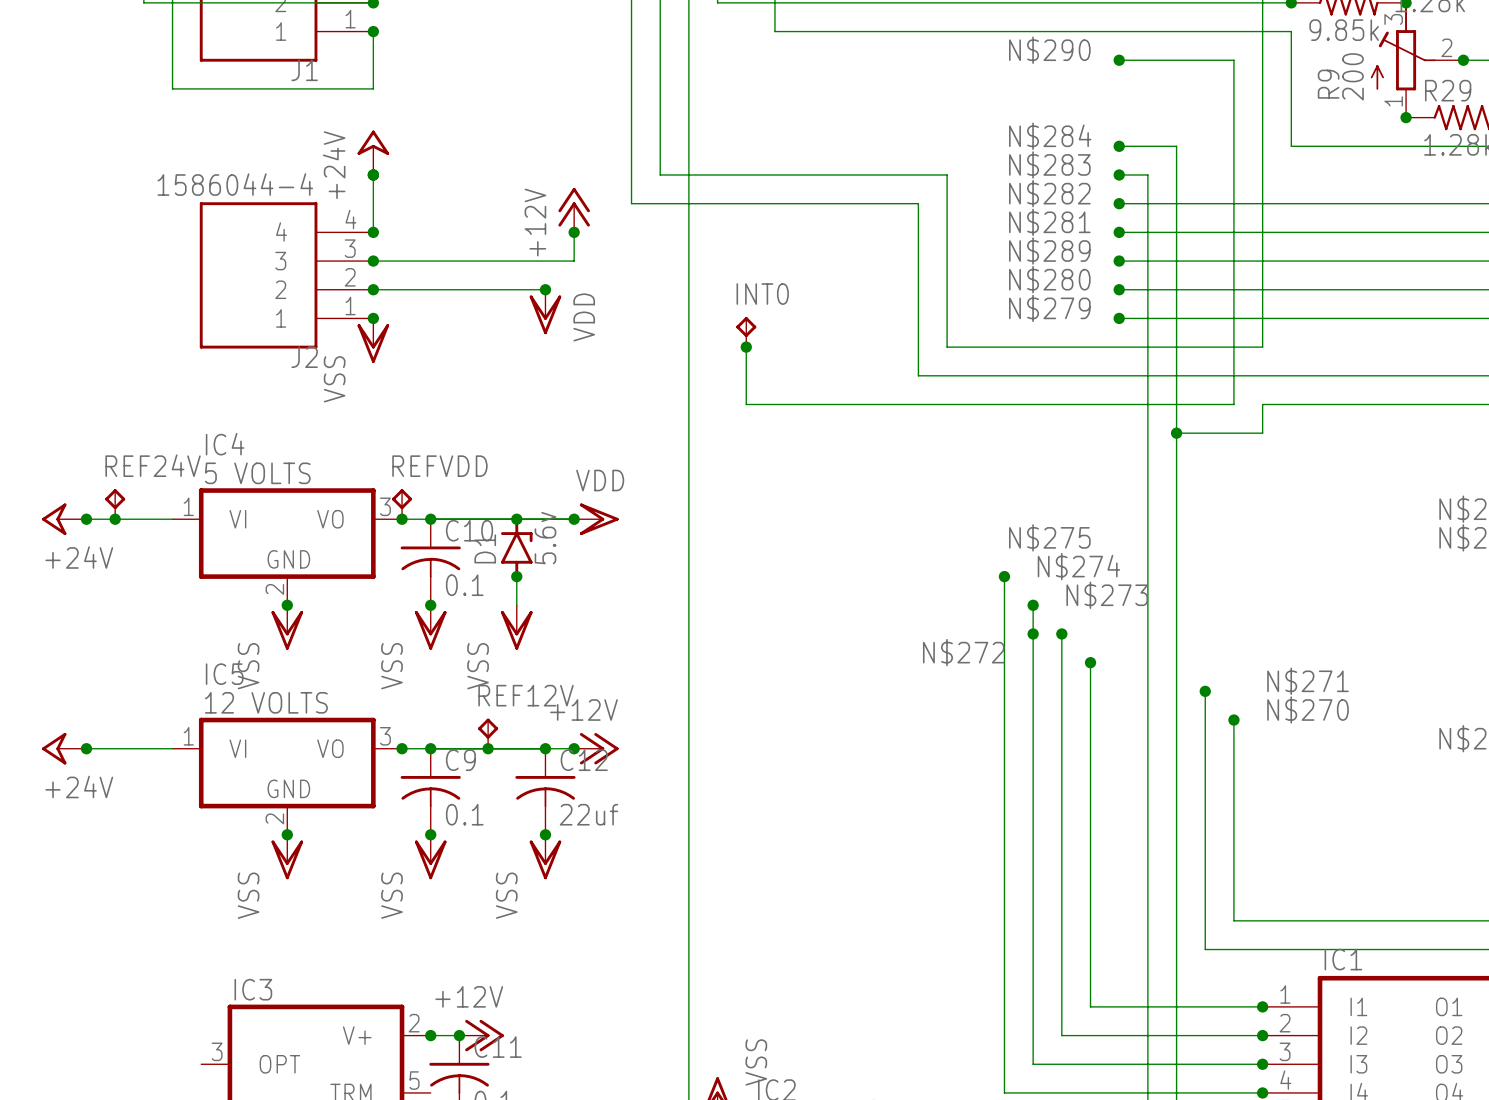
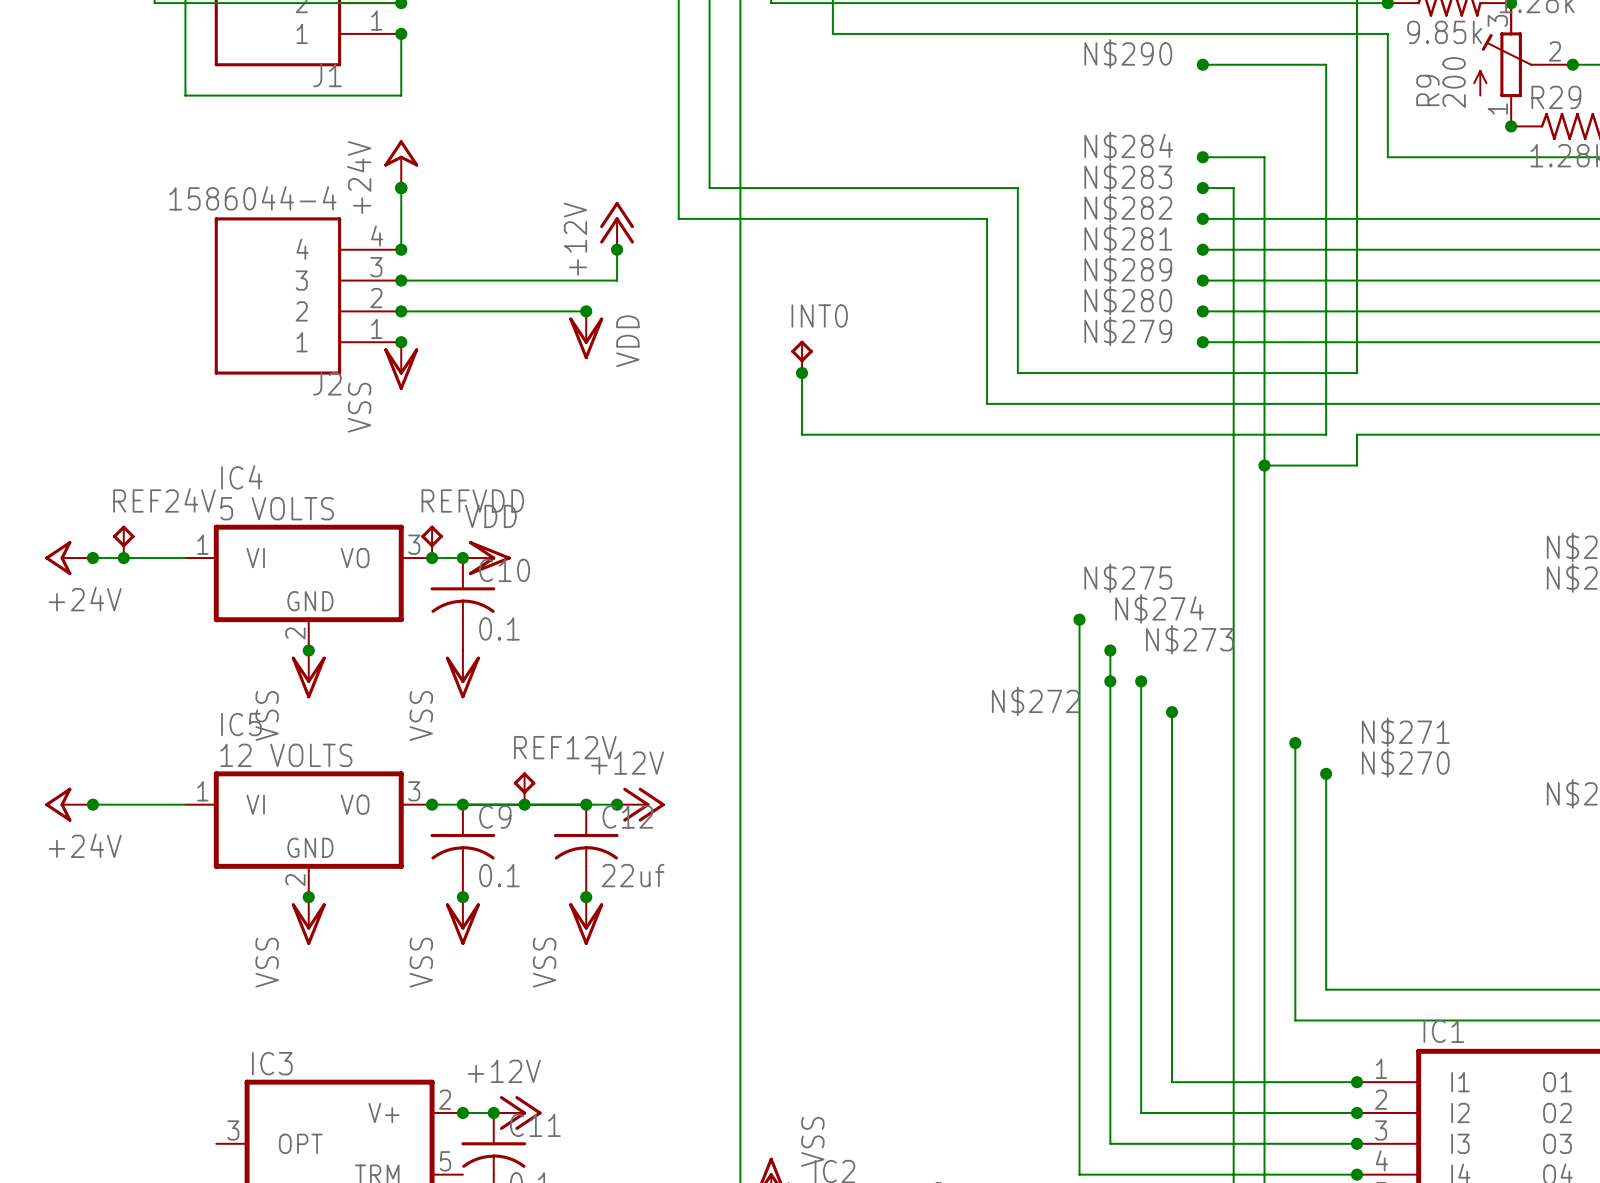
wire: (430, 519) (574, 519) -> none
junction: (516, 519) -> none
junction: (574, 519) -> none
power symbol position: VDD (596, 519) -> VDD (486, 558)
D1: 5.6v (516, 547) -> none
wire: (516, 576) (516, 605) -> none
junction: (516, 576) -> none
junction: (430, 605) -> none
power symbol: VSS (516, 627) -> none

